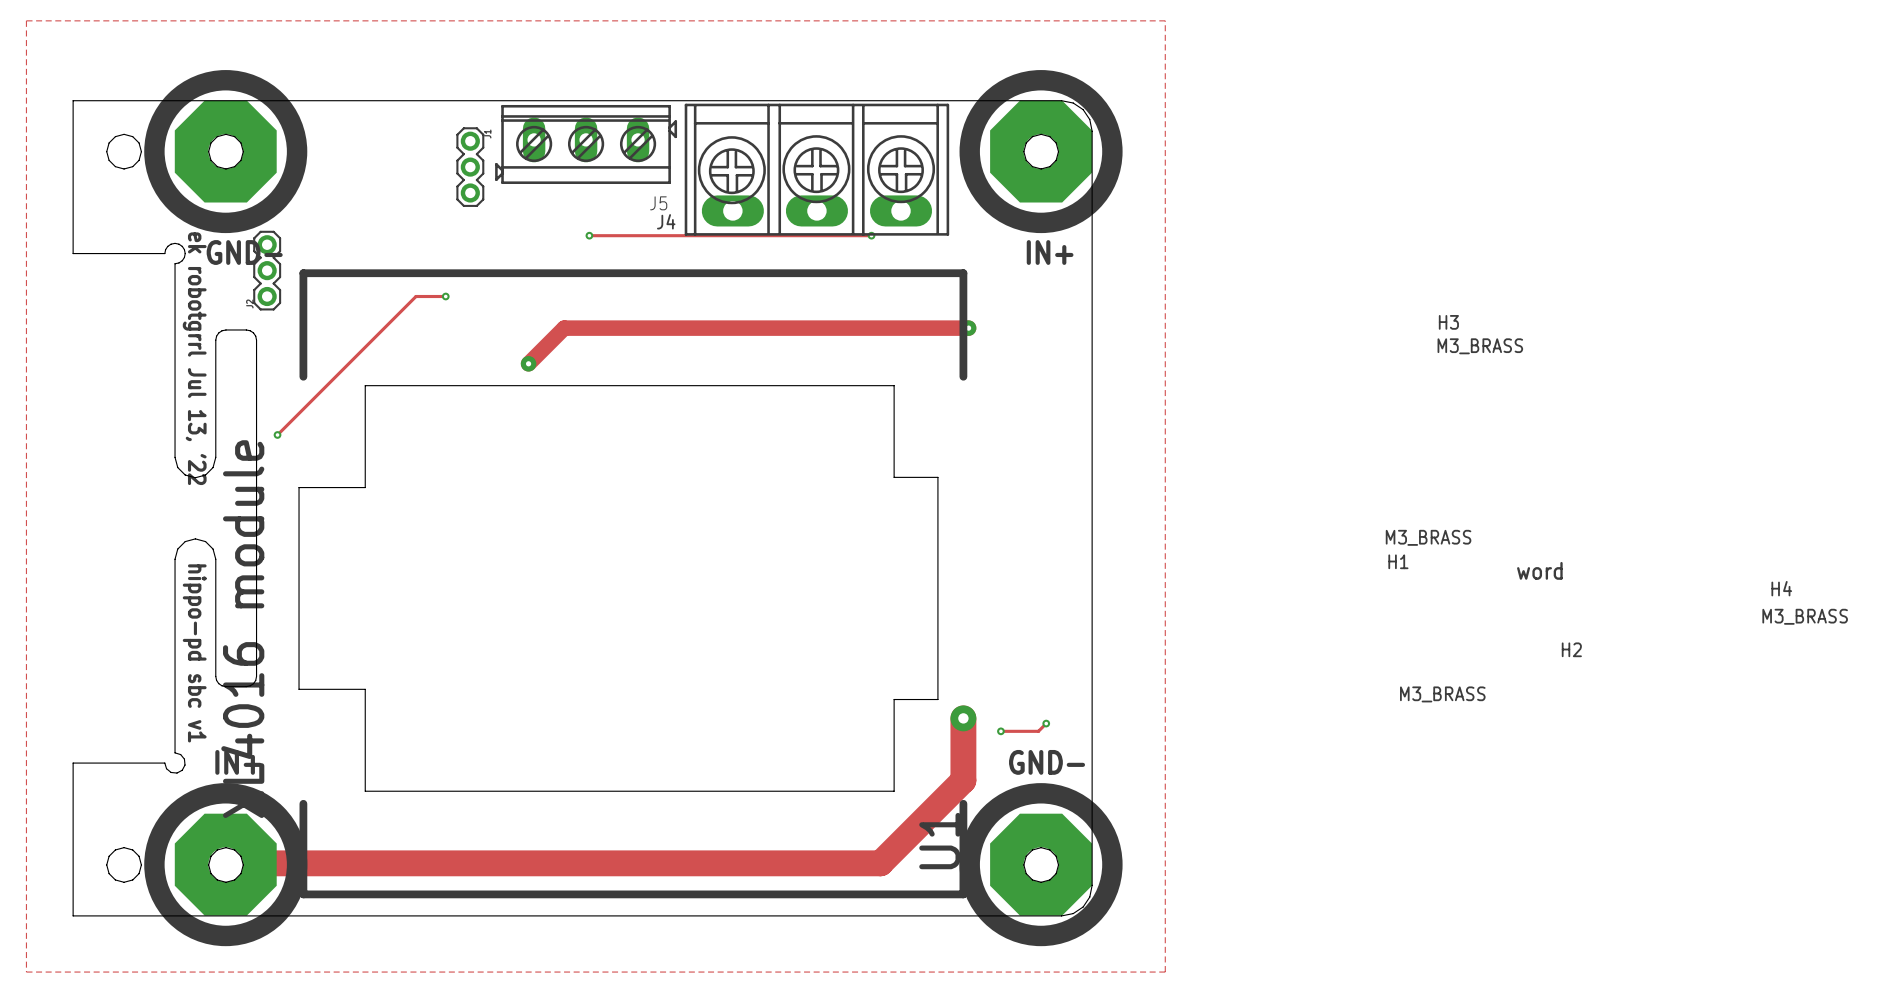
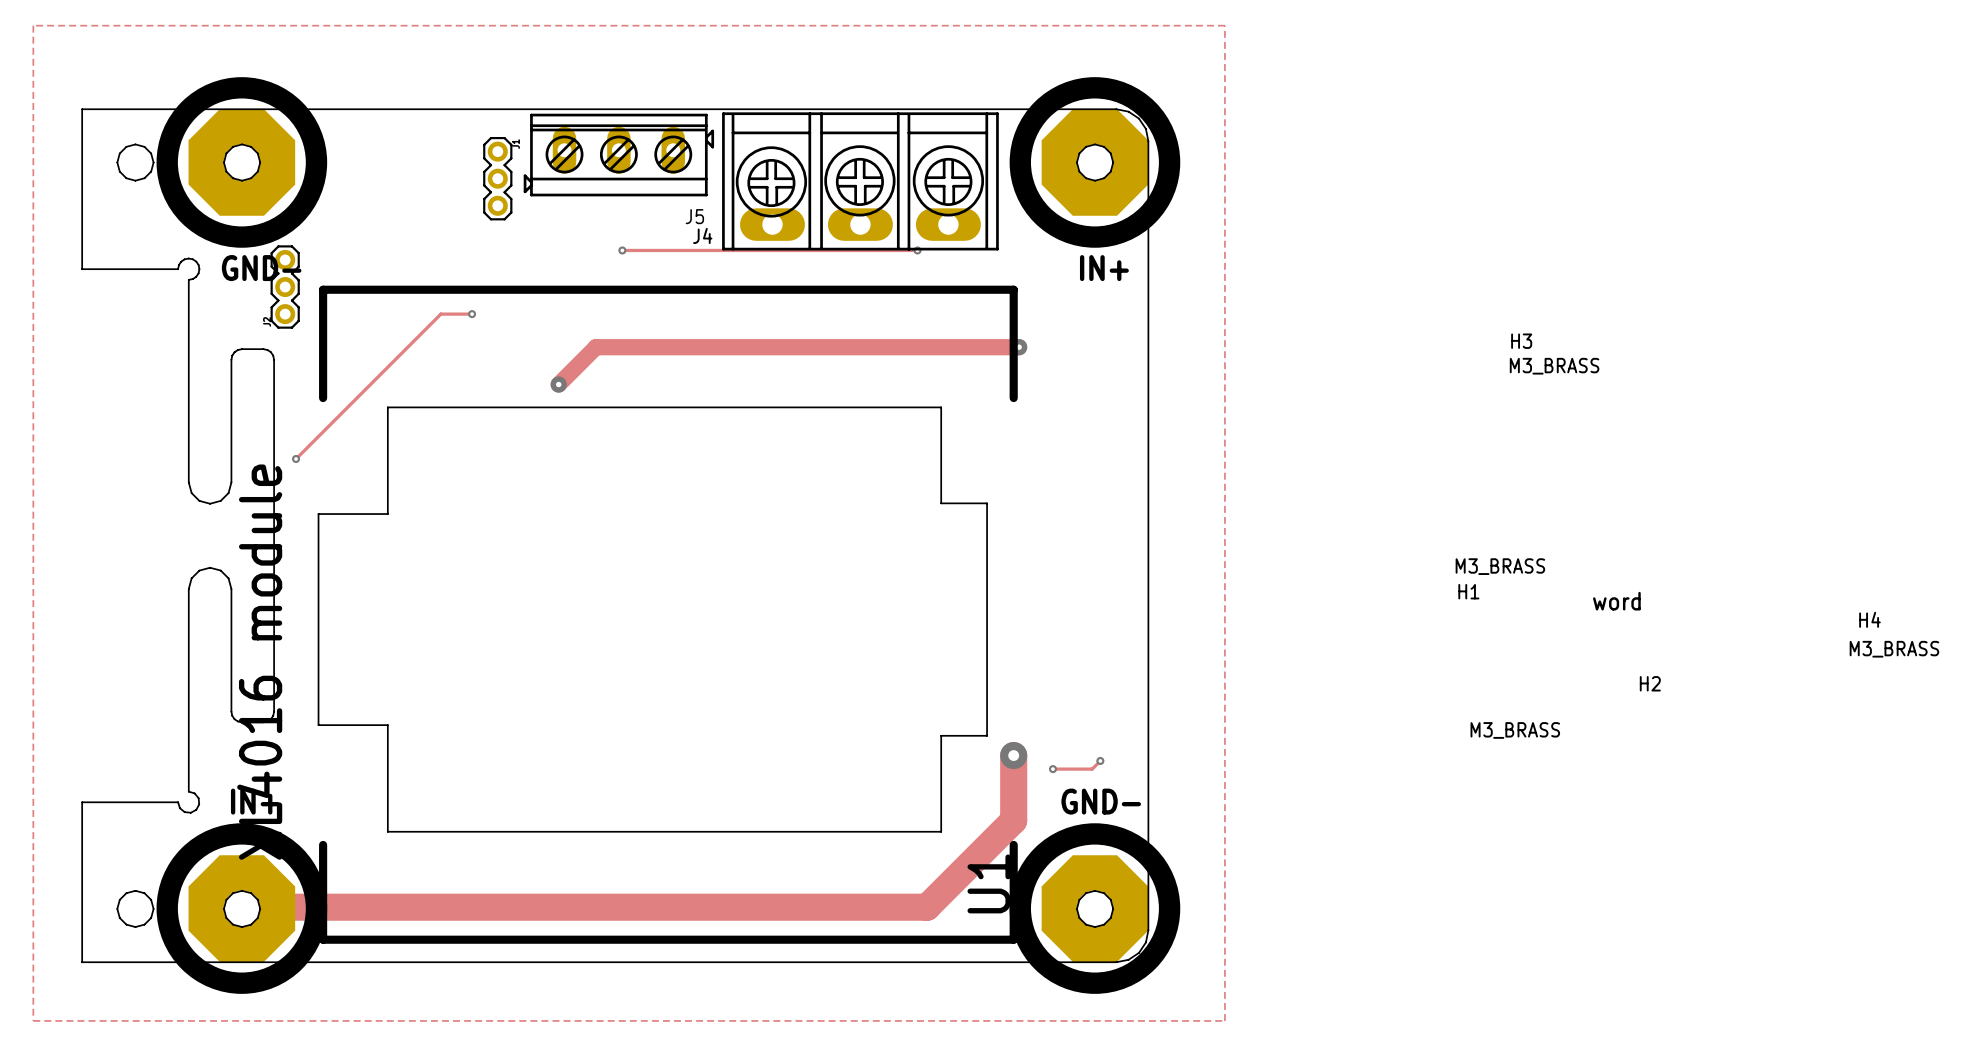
text: ek robotgrrl Jul 13, '22 (194, 358) -> none
text: hippo-pd sbc v1 (194, 653) -> none

